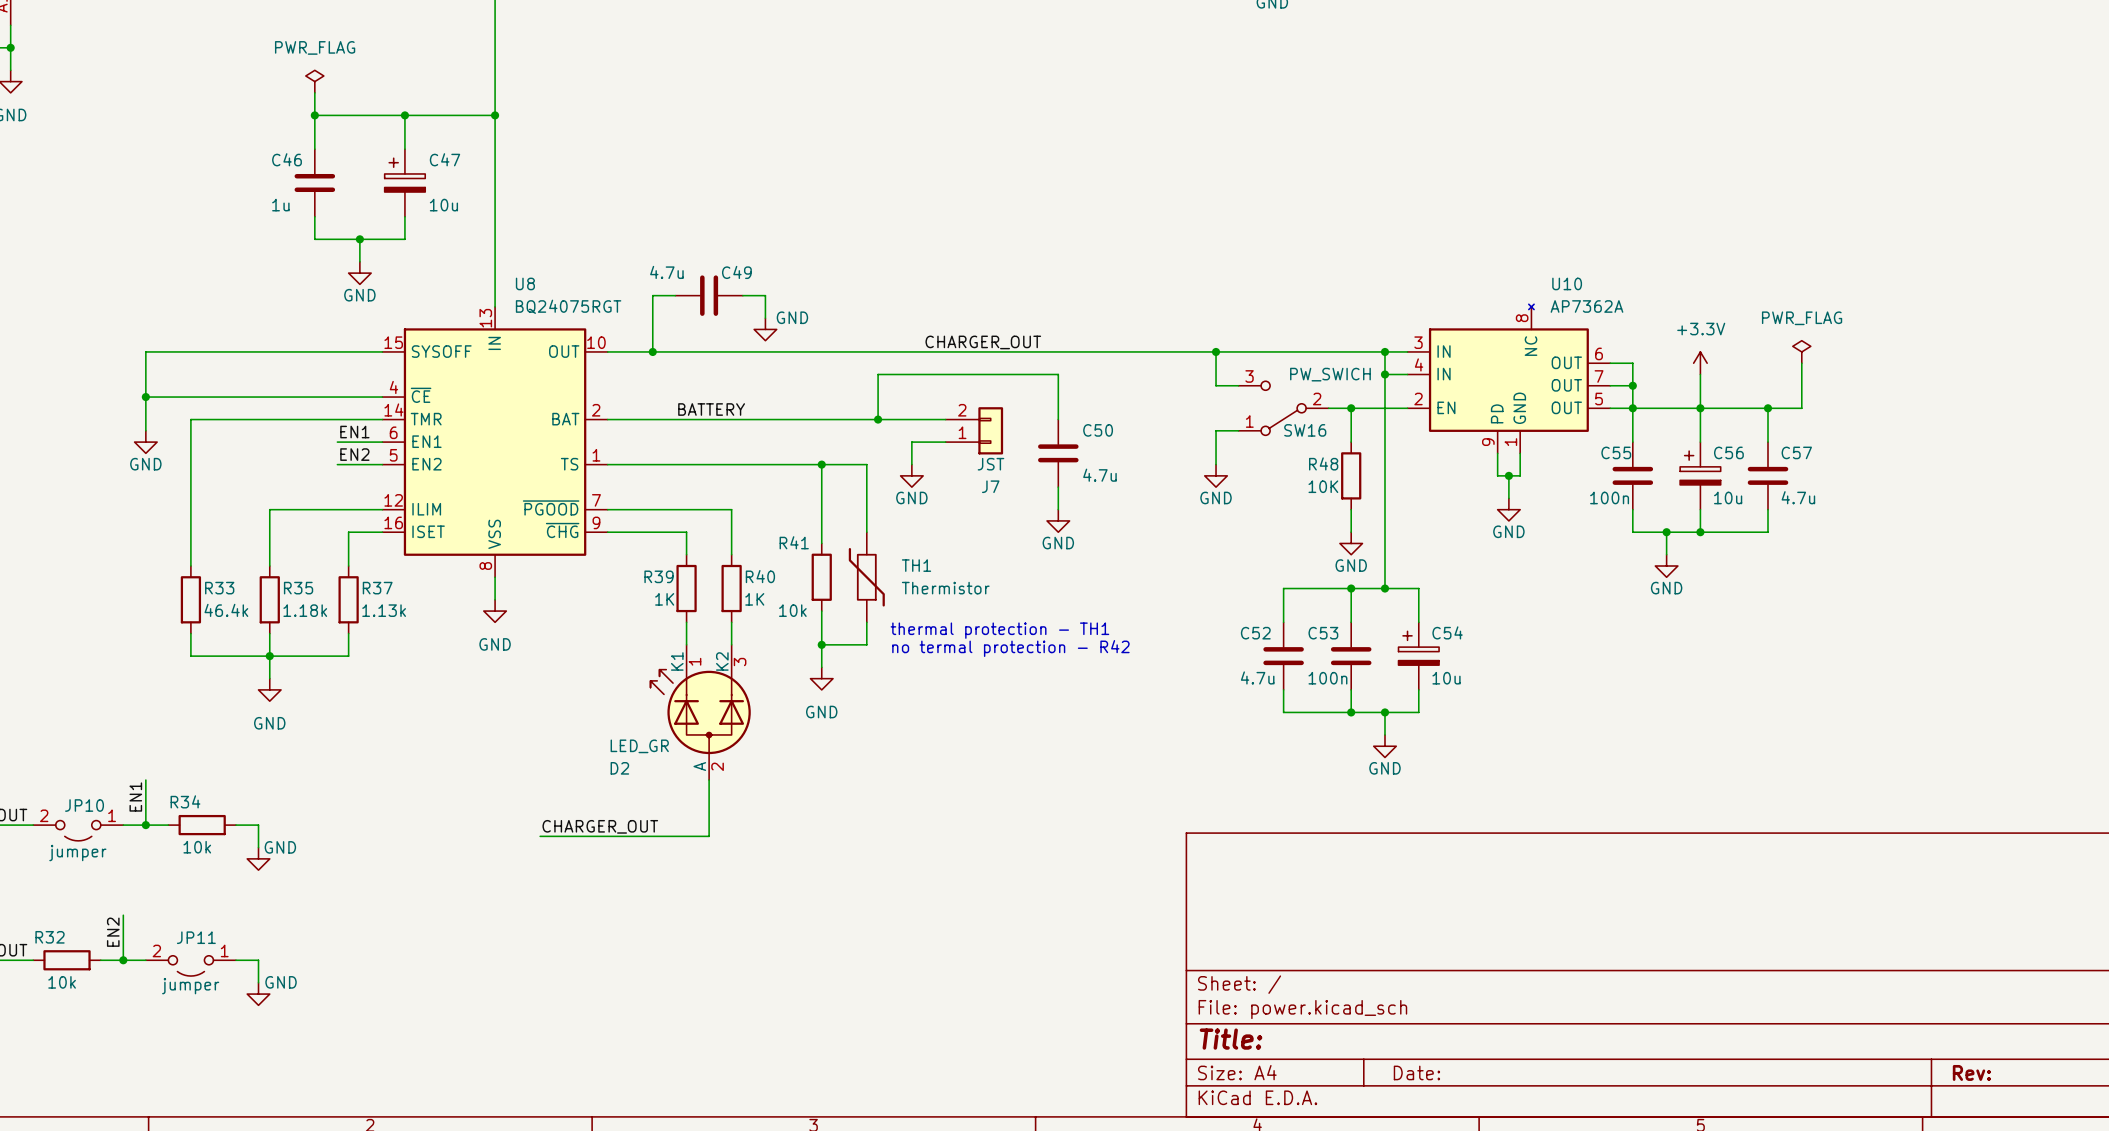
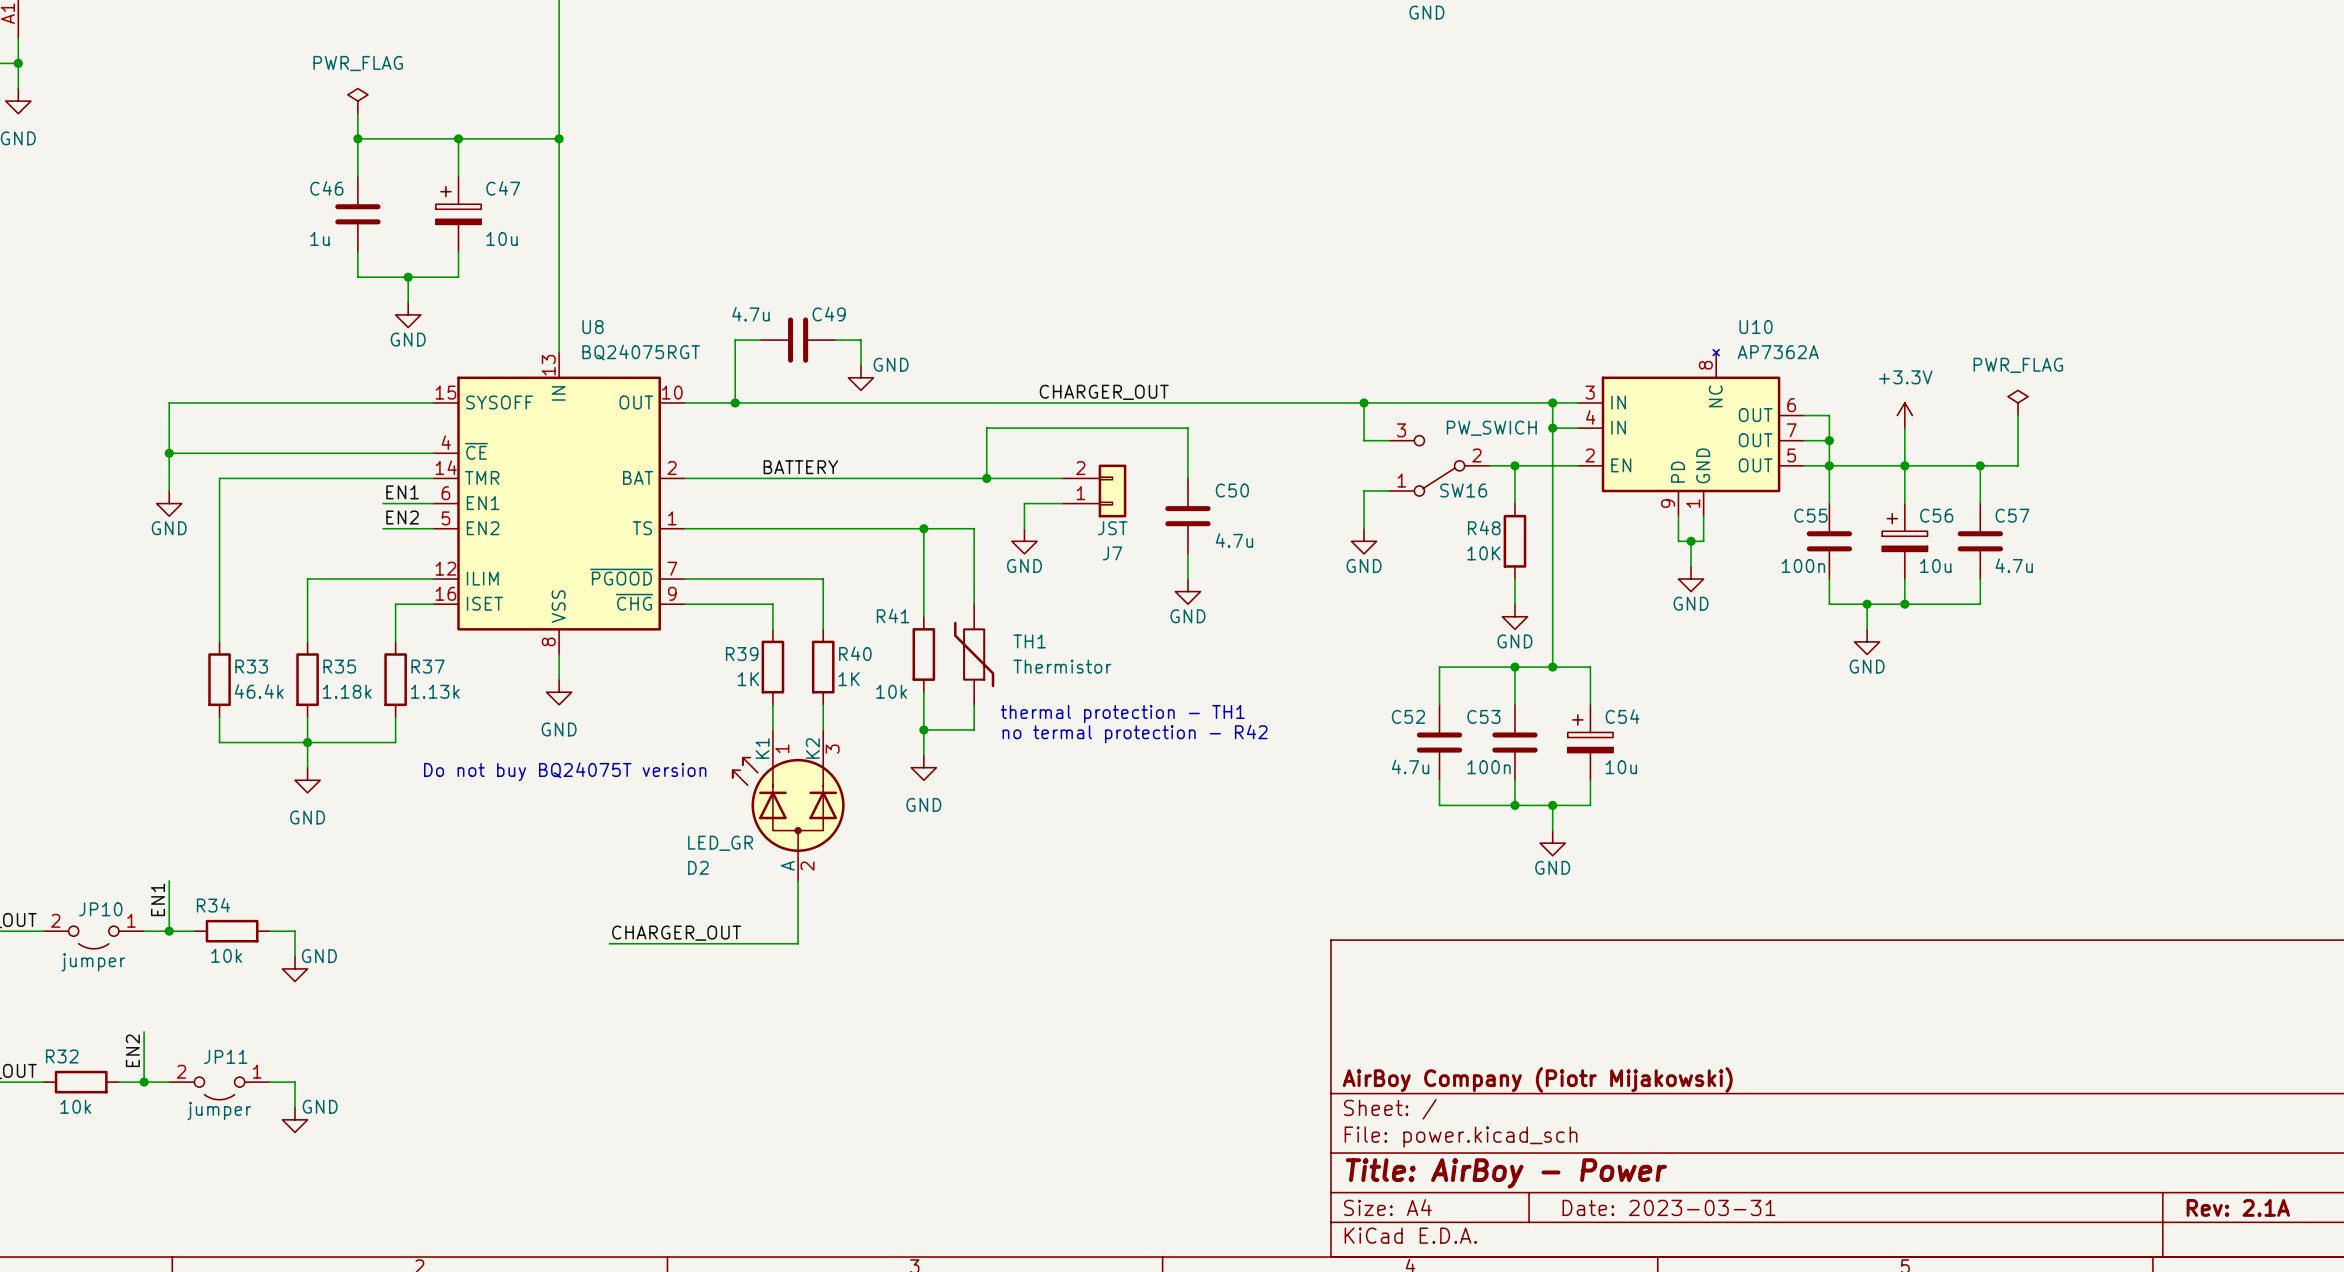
text: none -> Do not buy BQ24075T version (565, 771)
title block: none -> AirBoy Company (Piotr Mijakowski) (1537, 1079)
title block: Title: (1231, 1039) -> Title: AirBoy - Power (1506, 1173)
title block: Date: (1416, 1072) -> Date: 2023-03-31 (1669, 1207)
title block: Rev: (1971, 1072) -> Rev: 2.1A (2238, 1207)

